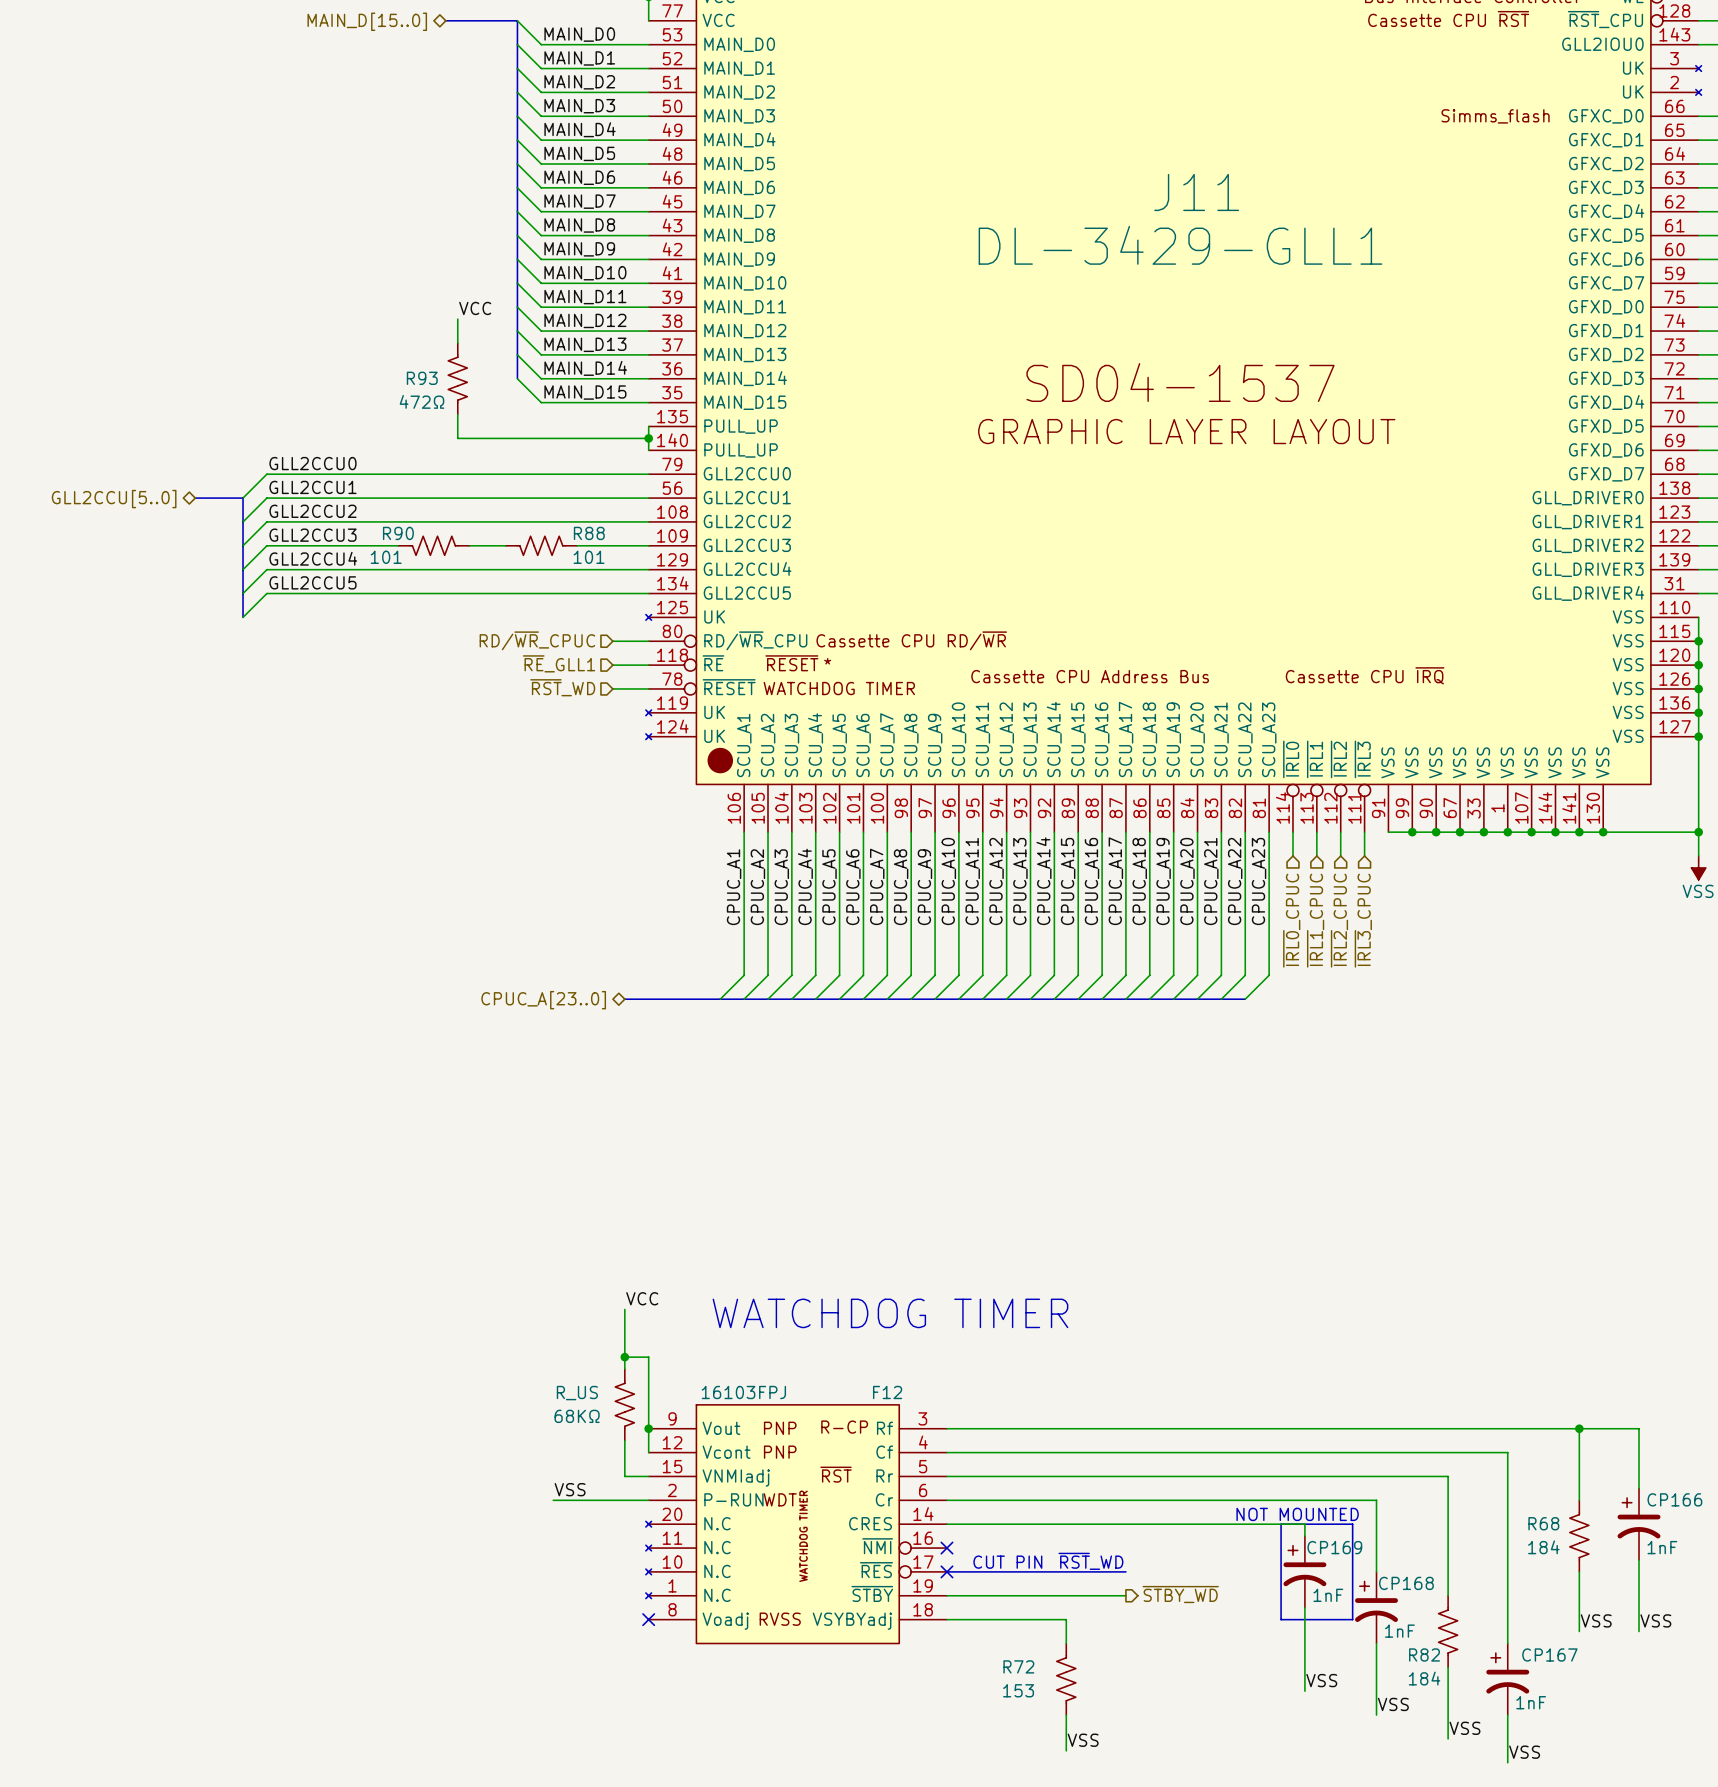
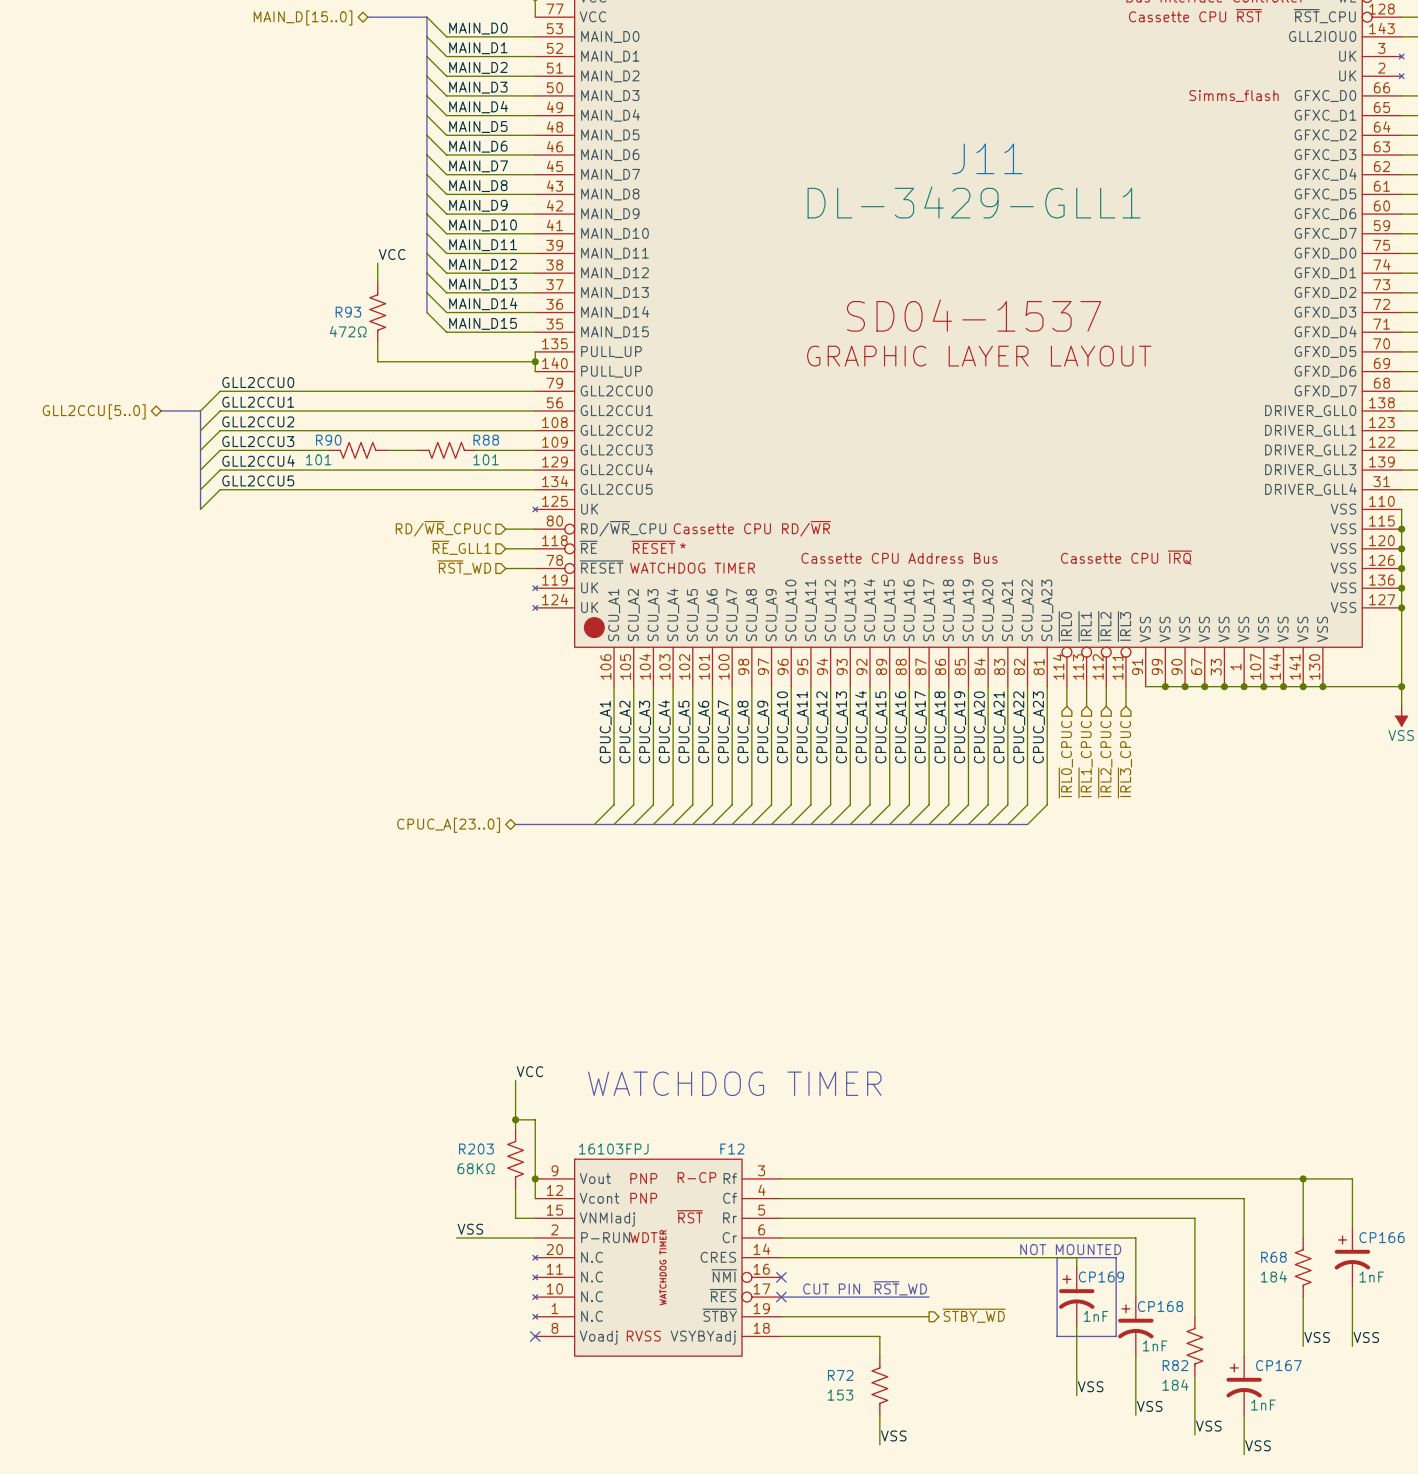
J11 pin name: GLL_DRIVER0 (1588, 498) -> DRIVER_GLL0 (1310, 411)
J11 pin name: GLL_DRIVER1 (1588, 522) -> DRIVER_GLL1 (1310, 430)
J11 pin name: GLL_DRIVER2 (1588, 545) -> DRIVER_GLL2 (1310, 450)
J11 pin name: GLL_DRIVER3 (1588, 569) -> DRIVER_GLL3 (1310, 470)
J11 pin name: GLL_DRIVER4 (1588, 593) -> DRIVER_GLL4 (1310, 489)
R_US name: R_US (577, 1393) -> R203 (476, 1149)

